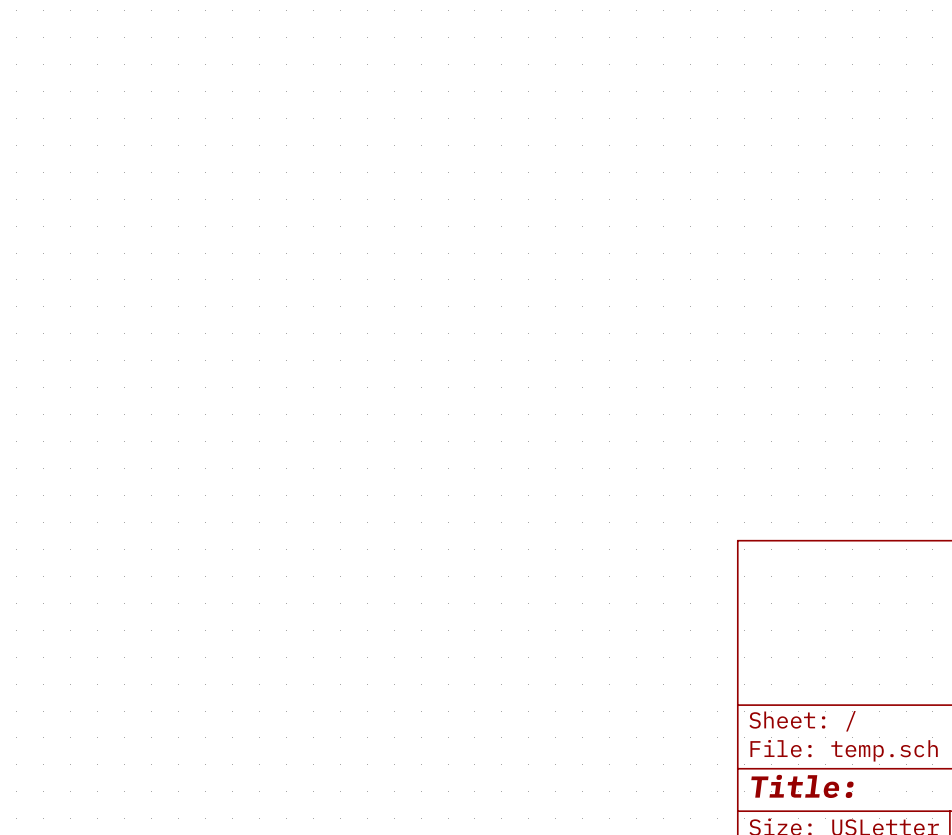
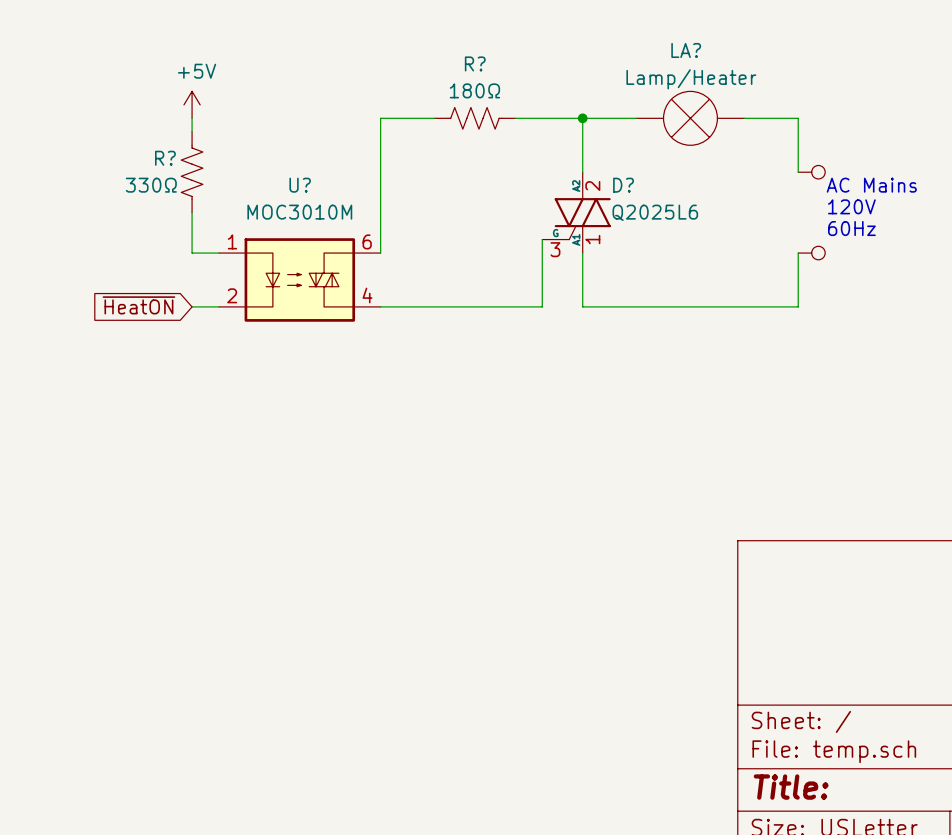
power symbol: none -> +5V (192, 104)
wire: none -> (192, 118) (192, 131)
wire: none -> (434, 118) (380, 118) (380, 253)
R?: none -> 180Ω (474, 118)
wire: none -> (515, 118) (636, 118)
wire: none -> (582, 118) (582, 172)
junction: none -> (582, 118)
LA?: none -> Lamp/Heater (690, 118)
wire: none -> (744, 118) (798, 118) (798, 172)
R?: none -> 330Ω (192, 172)
power symbol: none -> (811, 172)
text: none -> AC Mains (871, 185)
text: none -> 120V (851, 206)
wire: none -> (192, 212) (192, 253) (218, 253)
D?: none -> Q2025L6 (576, 212)
text: none -> 60Hz (851, 228)
wire: none -> (542, 239) (542, 306) (380, 306)
wire: none -> (582, 253) (582, 306) (798, 306) (798, 253)
power symbol: none -> (811, 253)
U?: none -> MOC3010M (299, 279)
global label: none -> ~{HeatON} (138, 305)
wire: none -> (192, 306) (218, 306)

